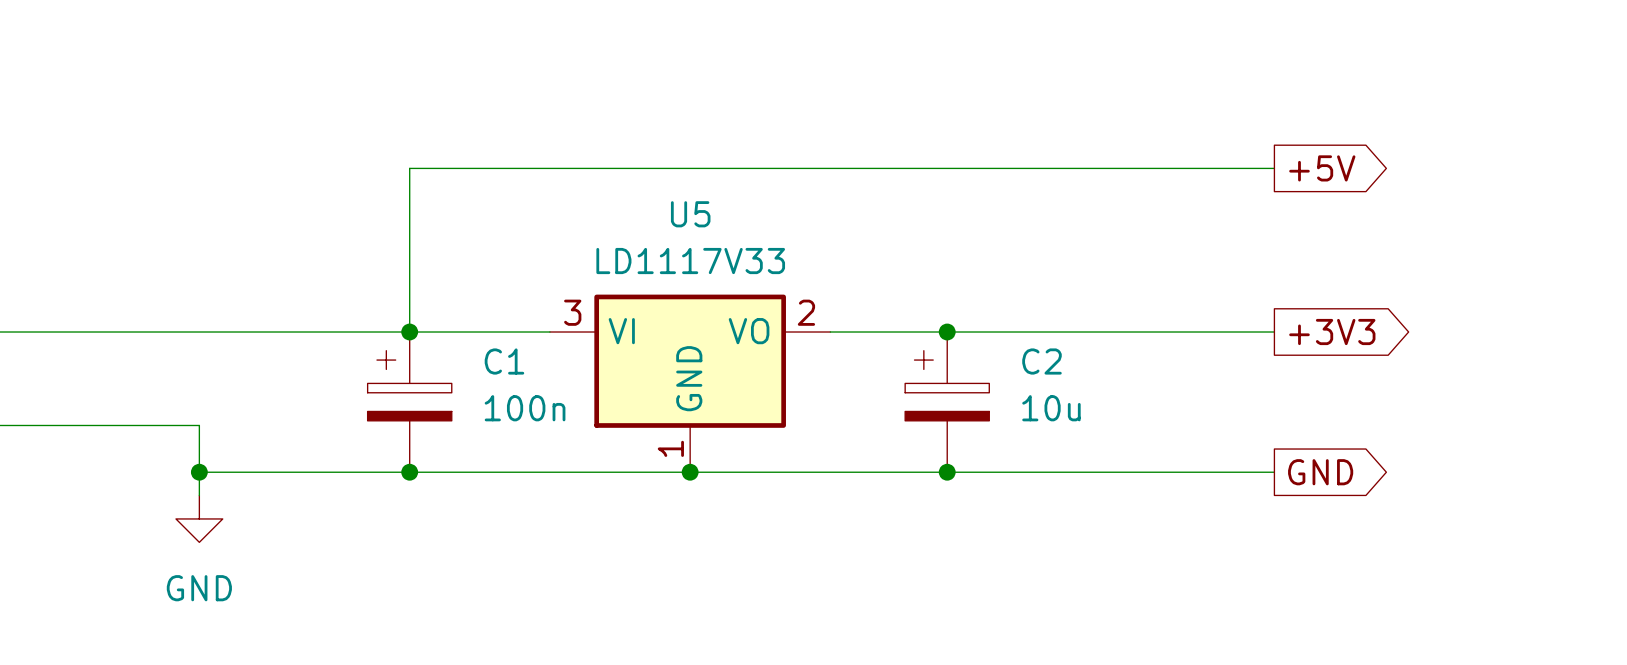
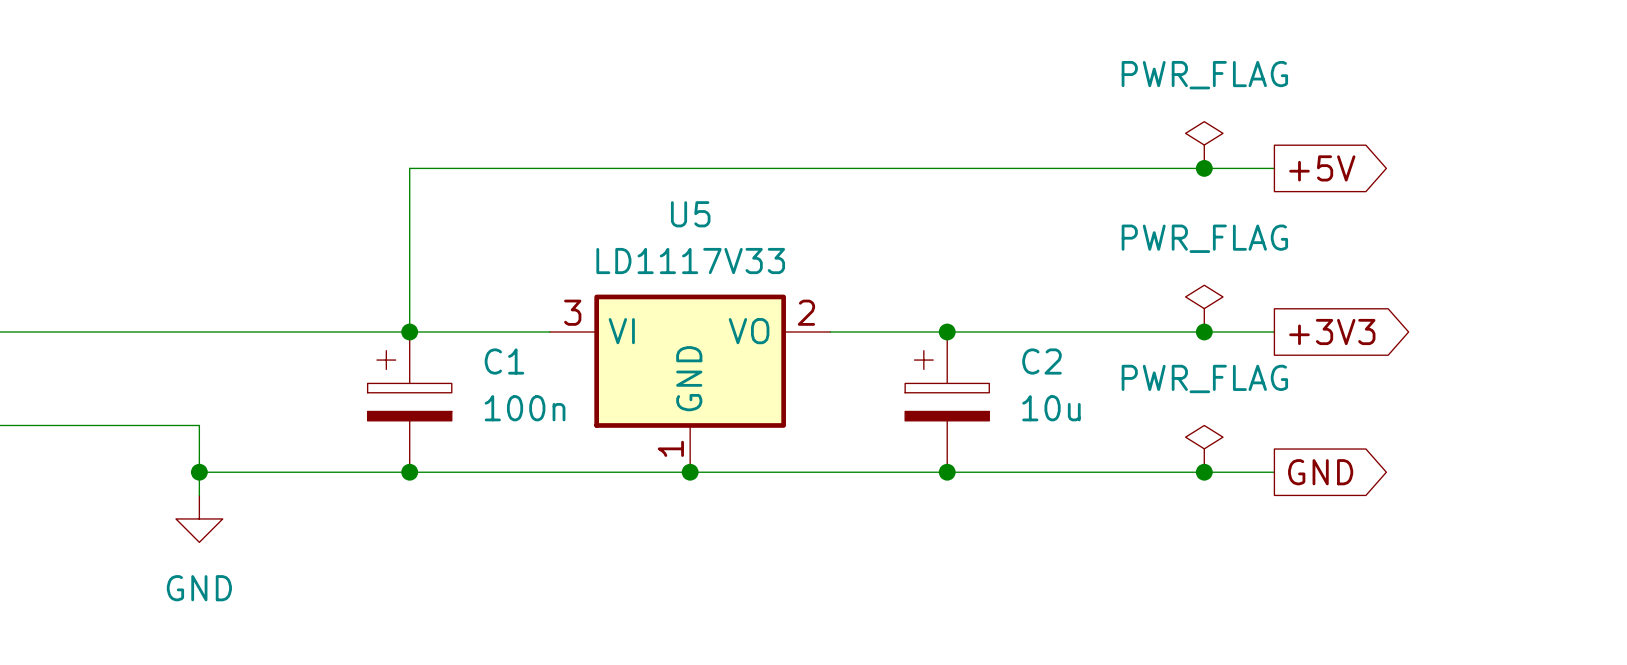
power symbol: none -> PWR_FLAG (1204, 145)
junction: none -> (1204, 168)
power symbol: none -> PWR_FLAG (1204, 308)
junction: none -> (1204, 332)
power symbol: none -> PWR_FLAG (1204, 448)
junction: none -> (1204, 472)

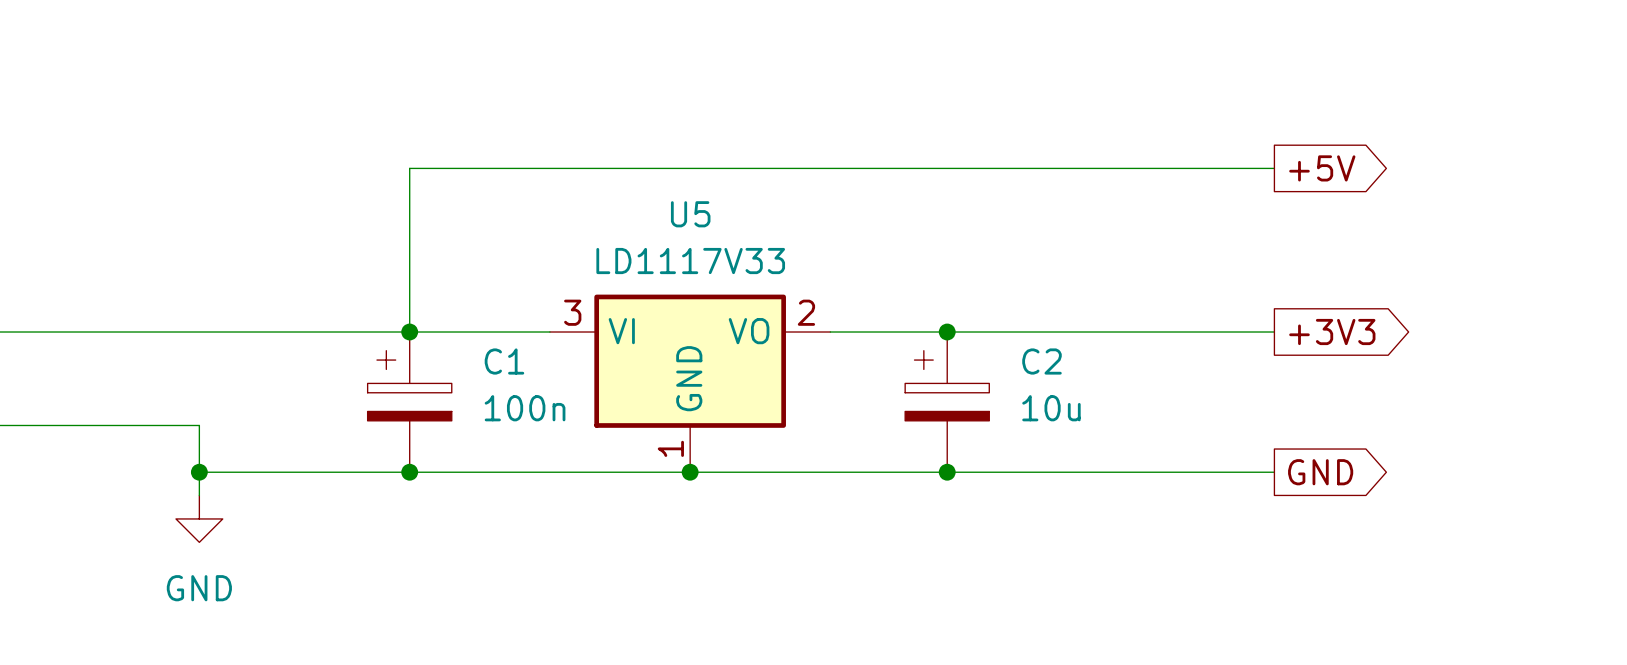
power symbol: PWR_FLAG (1204, 145) -> none
junction: (1204, 168) -> none
power symbol: PWR_FLAG (1204, 308) -> none
junction: (1204, 332) -> none
power symbol: PWR_FLAG (1204, 448) -> none
junction: (1204, 472) -> none

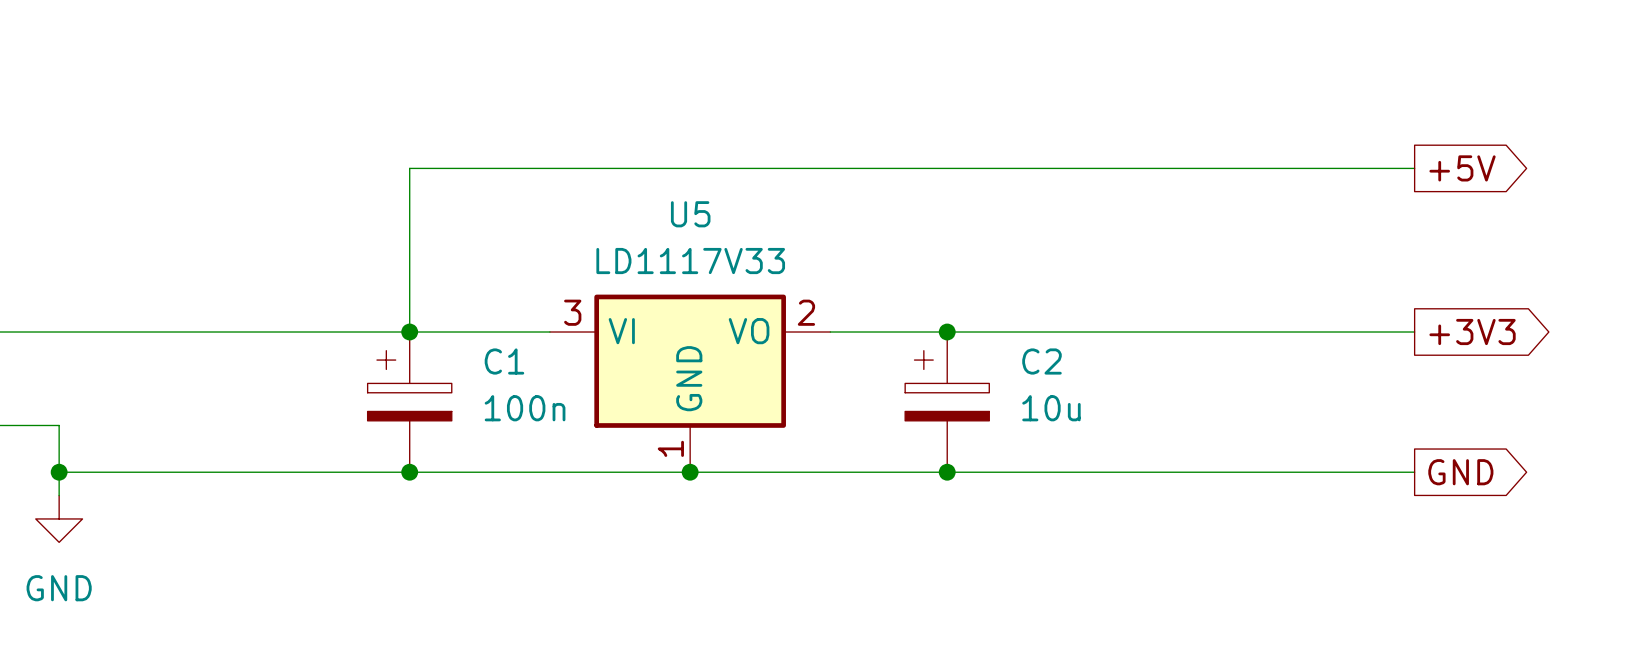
wire: none -> (1274, 168) (1414, 168)
global label position: +5V (1322, 168) -> +5V (1462, 168)
wire: none -> (1274, 332) (1414, 332)
global label position: +3V3 (1332, 332) -> +3V3 (1472, 332)
wire: (59, 425) (199, 425) (199, 495) -> (59, 425) (59, 495)
wire: none -> (59, 472) (199, 472)
junction: none -> (59, 472)
junction: (199, 472) -> none
wire: none -> (1274, 472) (1414, 472)
global label position: GND (1320, 472) -> GND (1460, 472)
power symbol position: GND (199, 518) -> GND (59, 518)

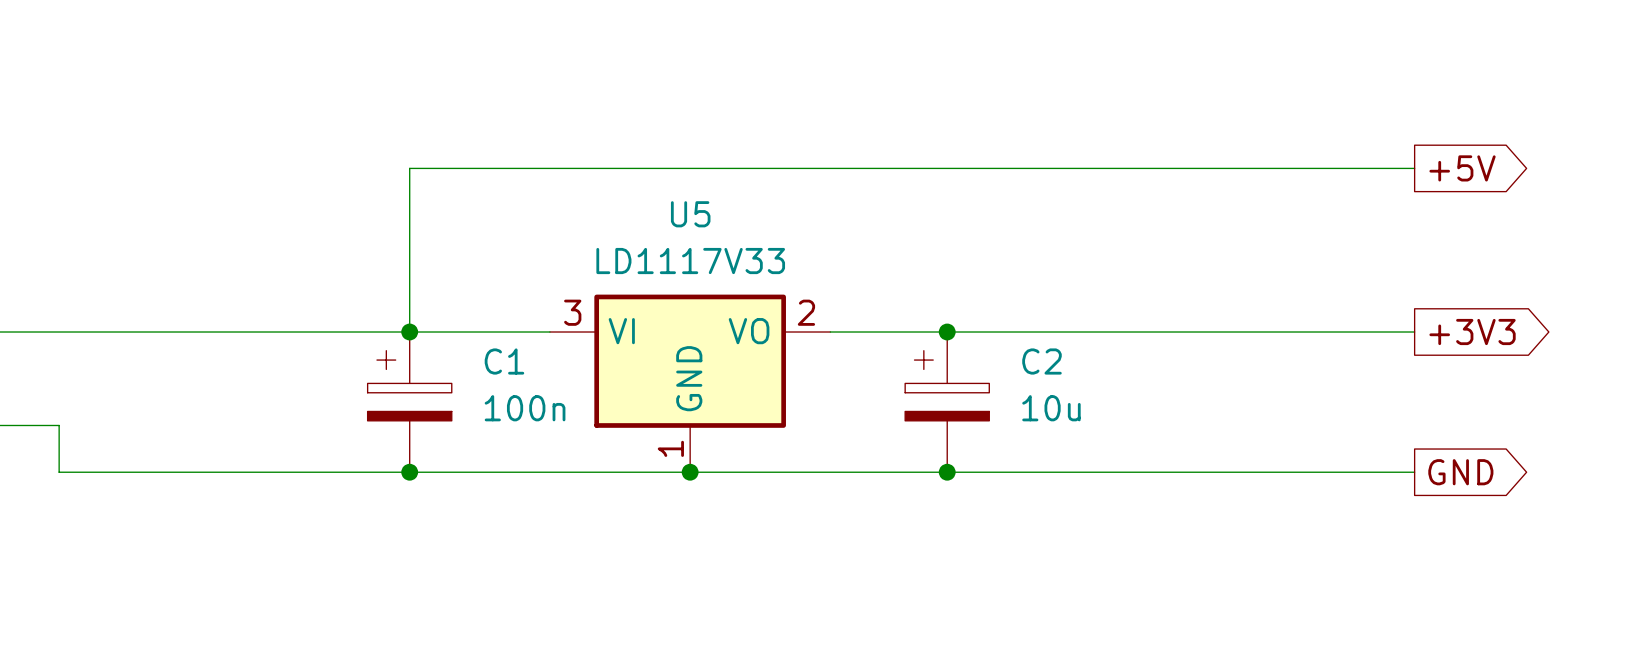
wire: (59, 472) (59, 495) -> none
junction: (59, 472) -> none
power symbol: GND (59, 518) -> none

